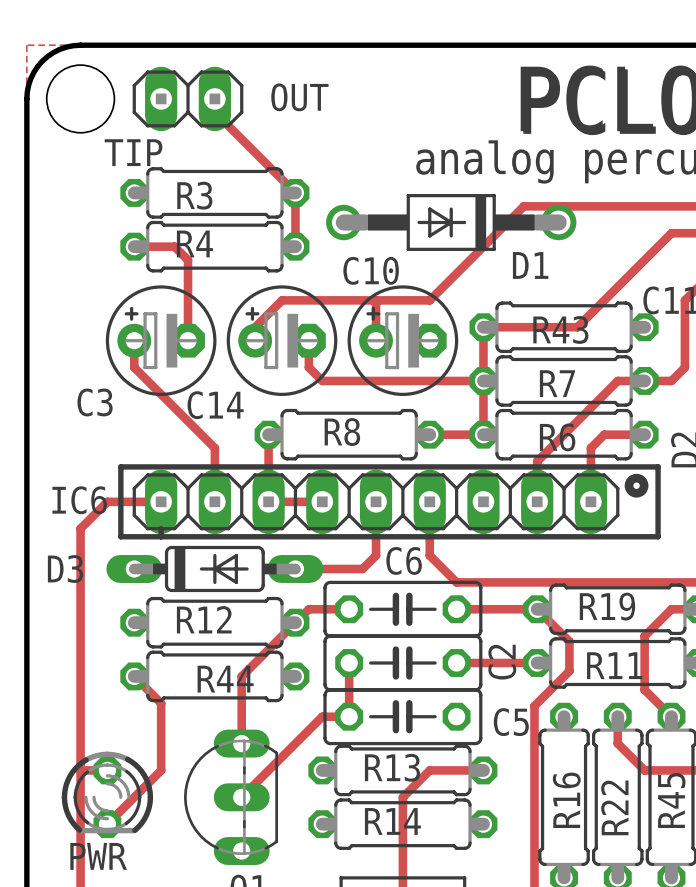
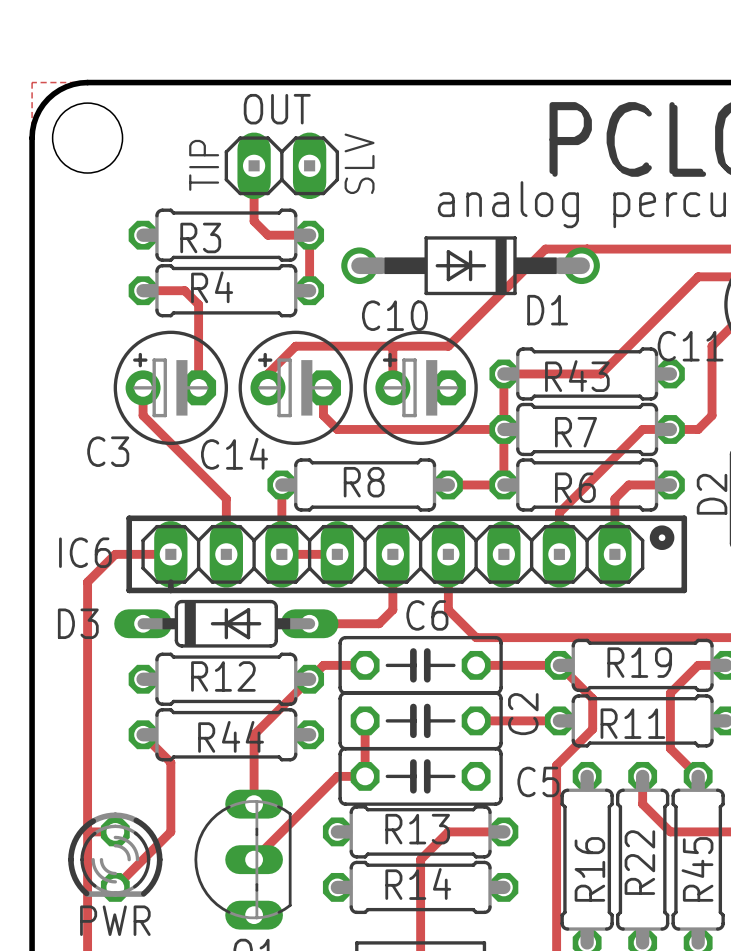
OUT name position: OUT (299, 97) -> OUT (277, 109)
OUT position: (188, 98) -> (281, 165)
track: (214, 98) (214, 112) (295, 192) -> (254, 165) (254, 221) (267, 235) (309, 235)
text: none -> SLV (359, 163)
text rotation: 0° (133, 152) -> 90° counterclockwise (204, 165)
text position: TIP (133, 152) -> TIP (204, 165)

